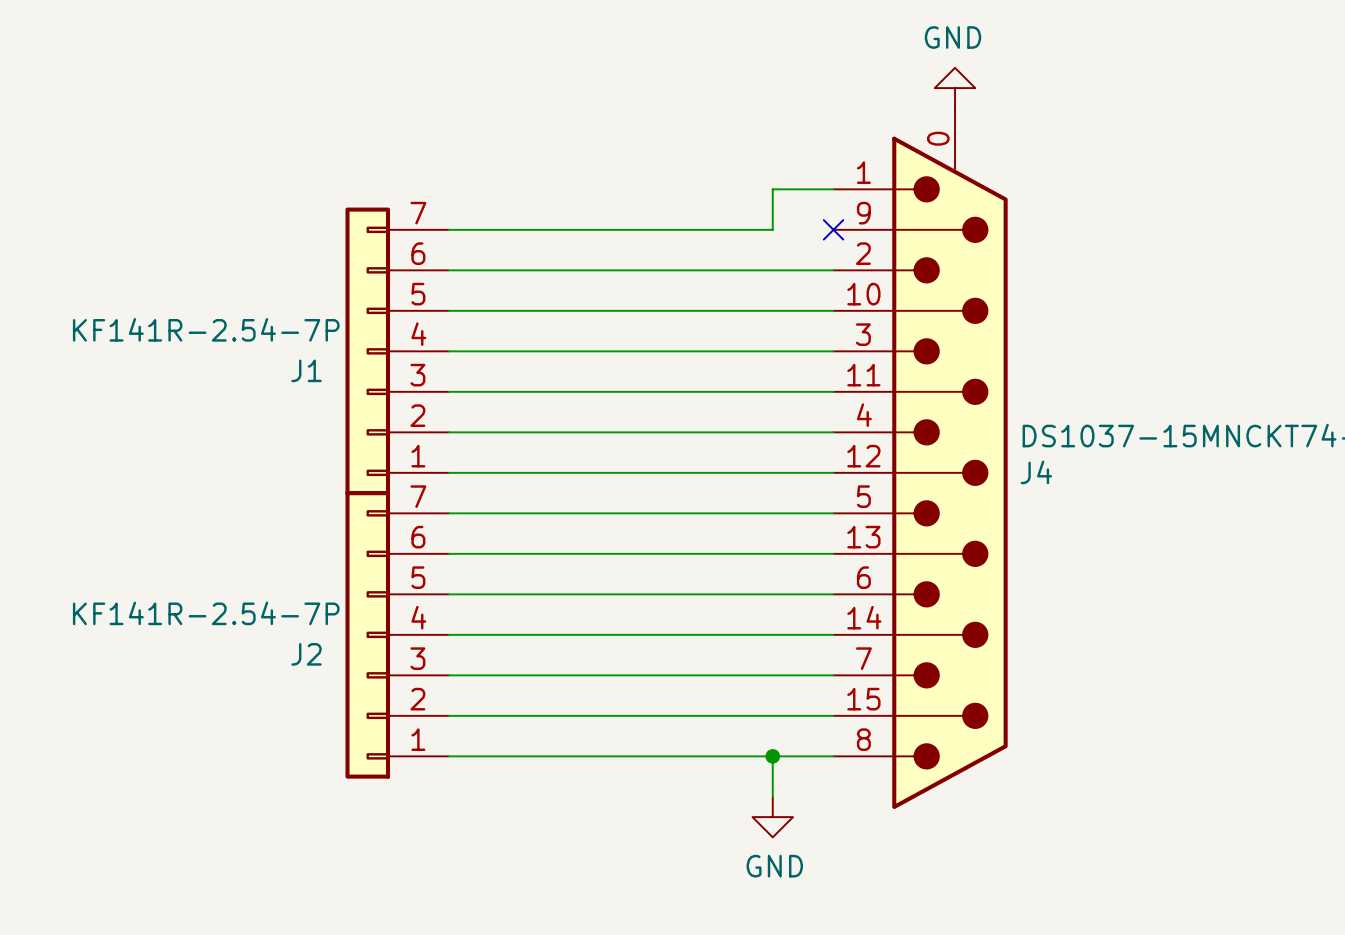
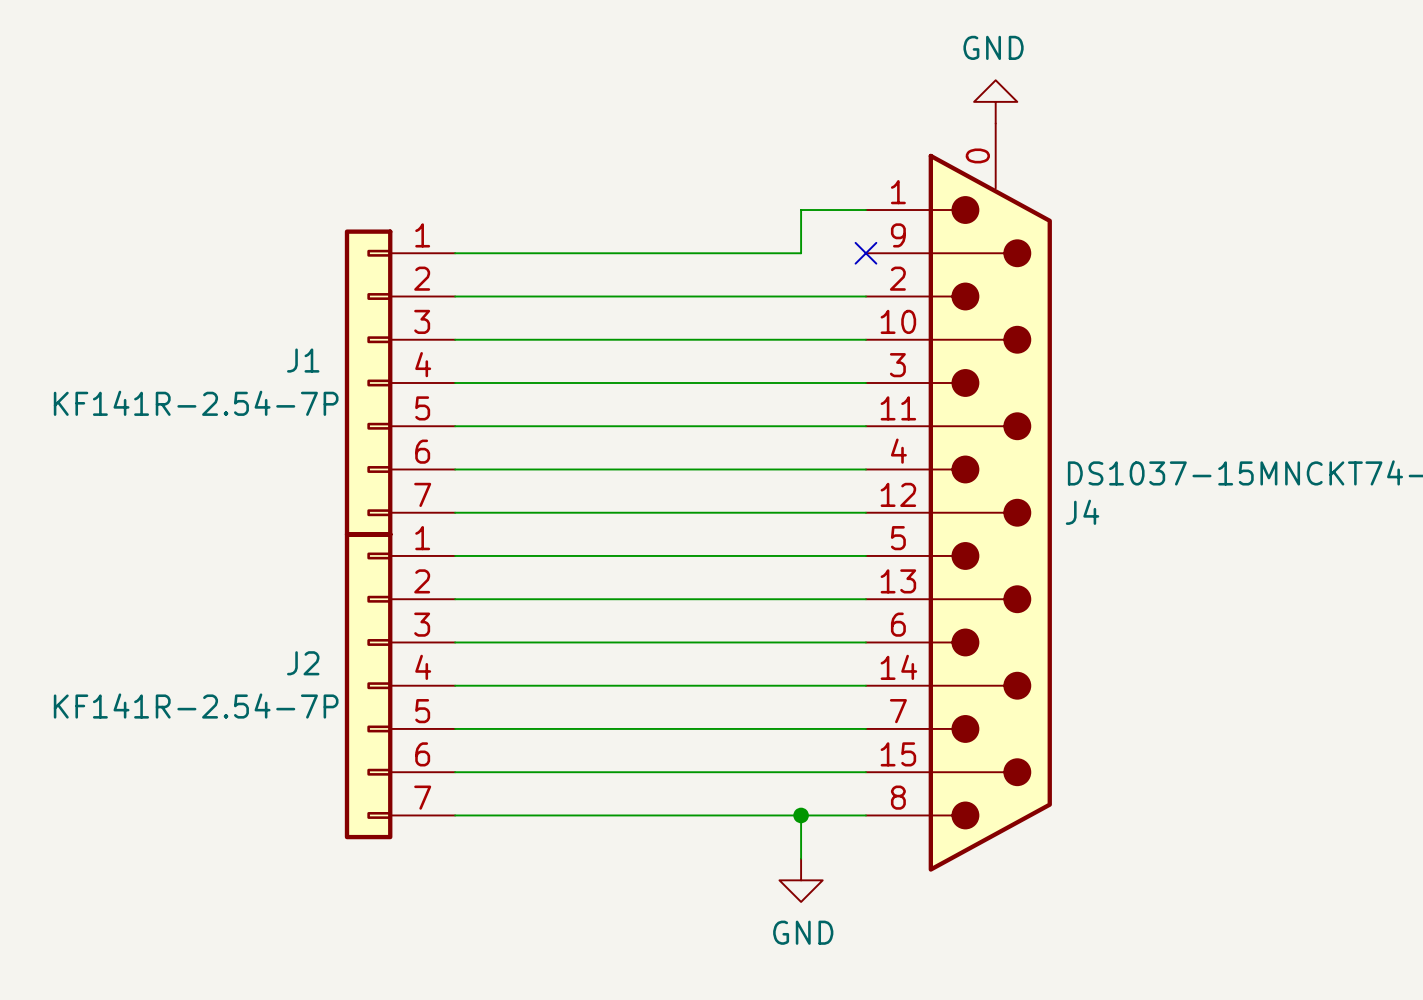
J1 flip: as is (367, 351) -> up-down (368, 382)
J2 flip: as is (367, 634) -> up-down (368, 685)

